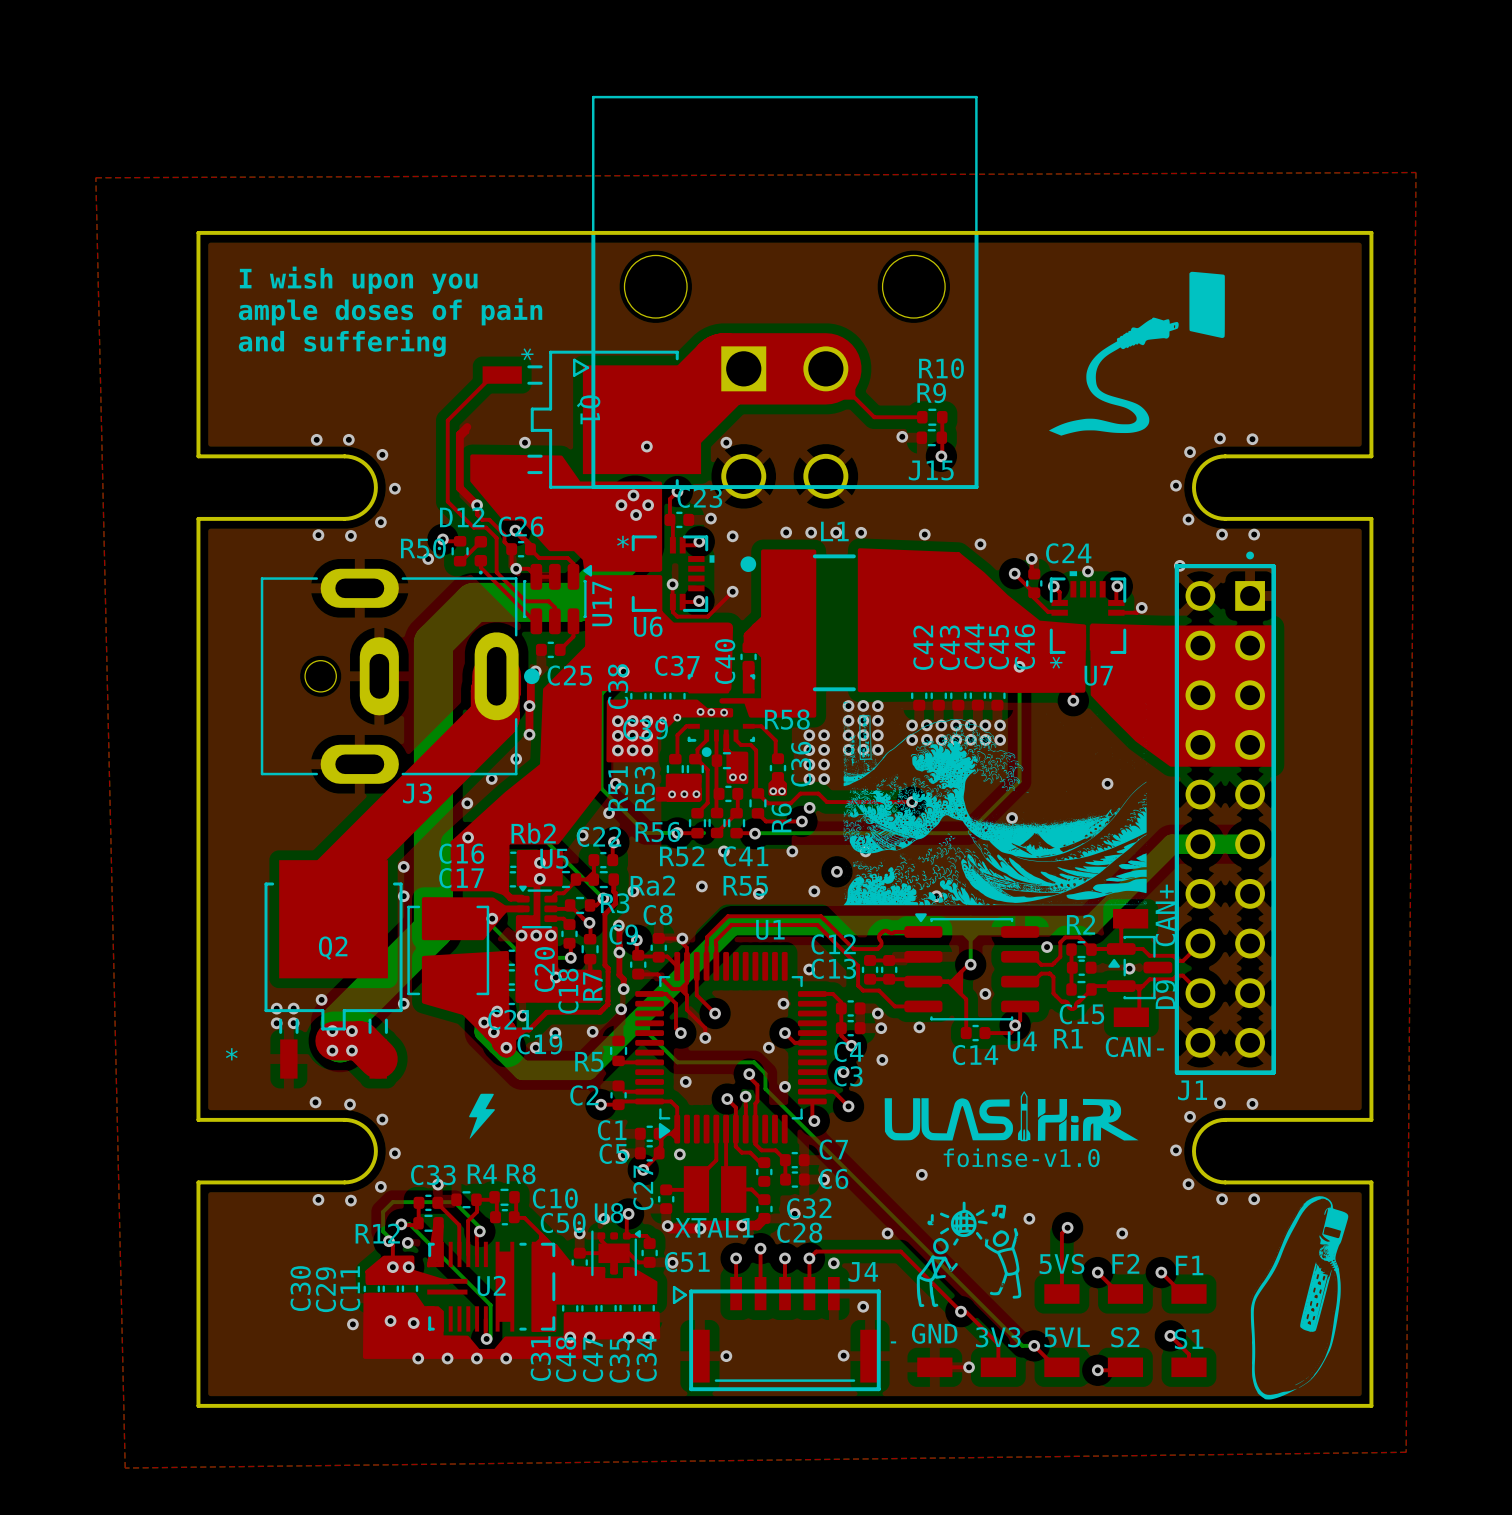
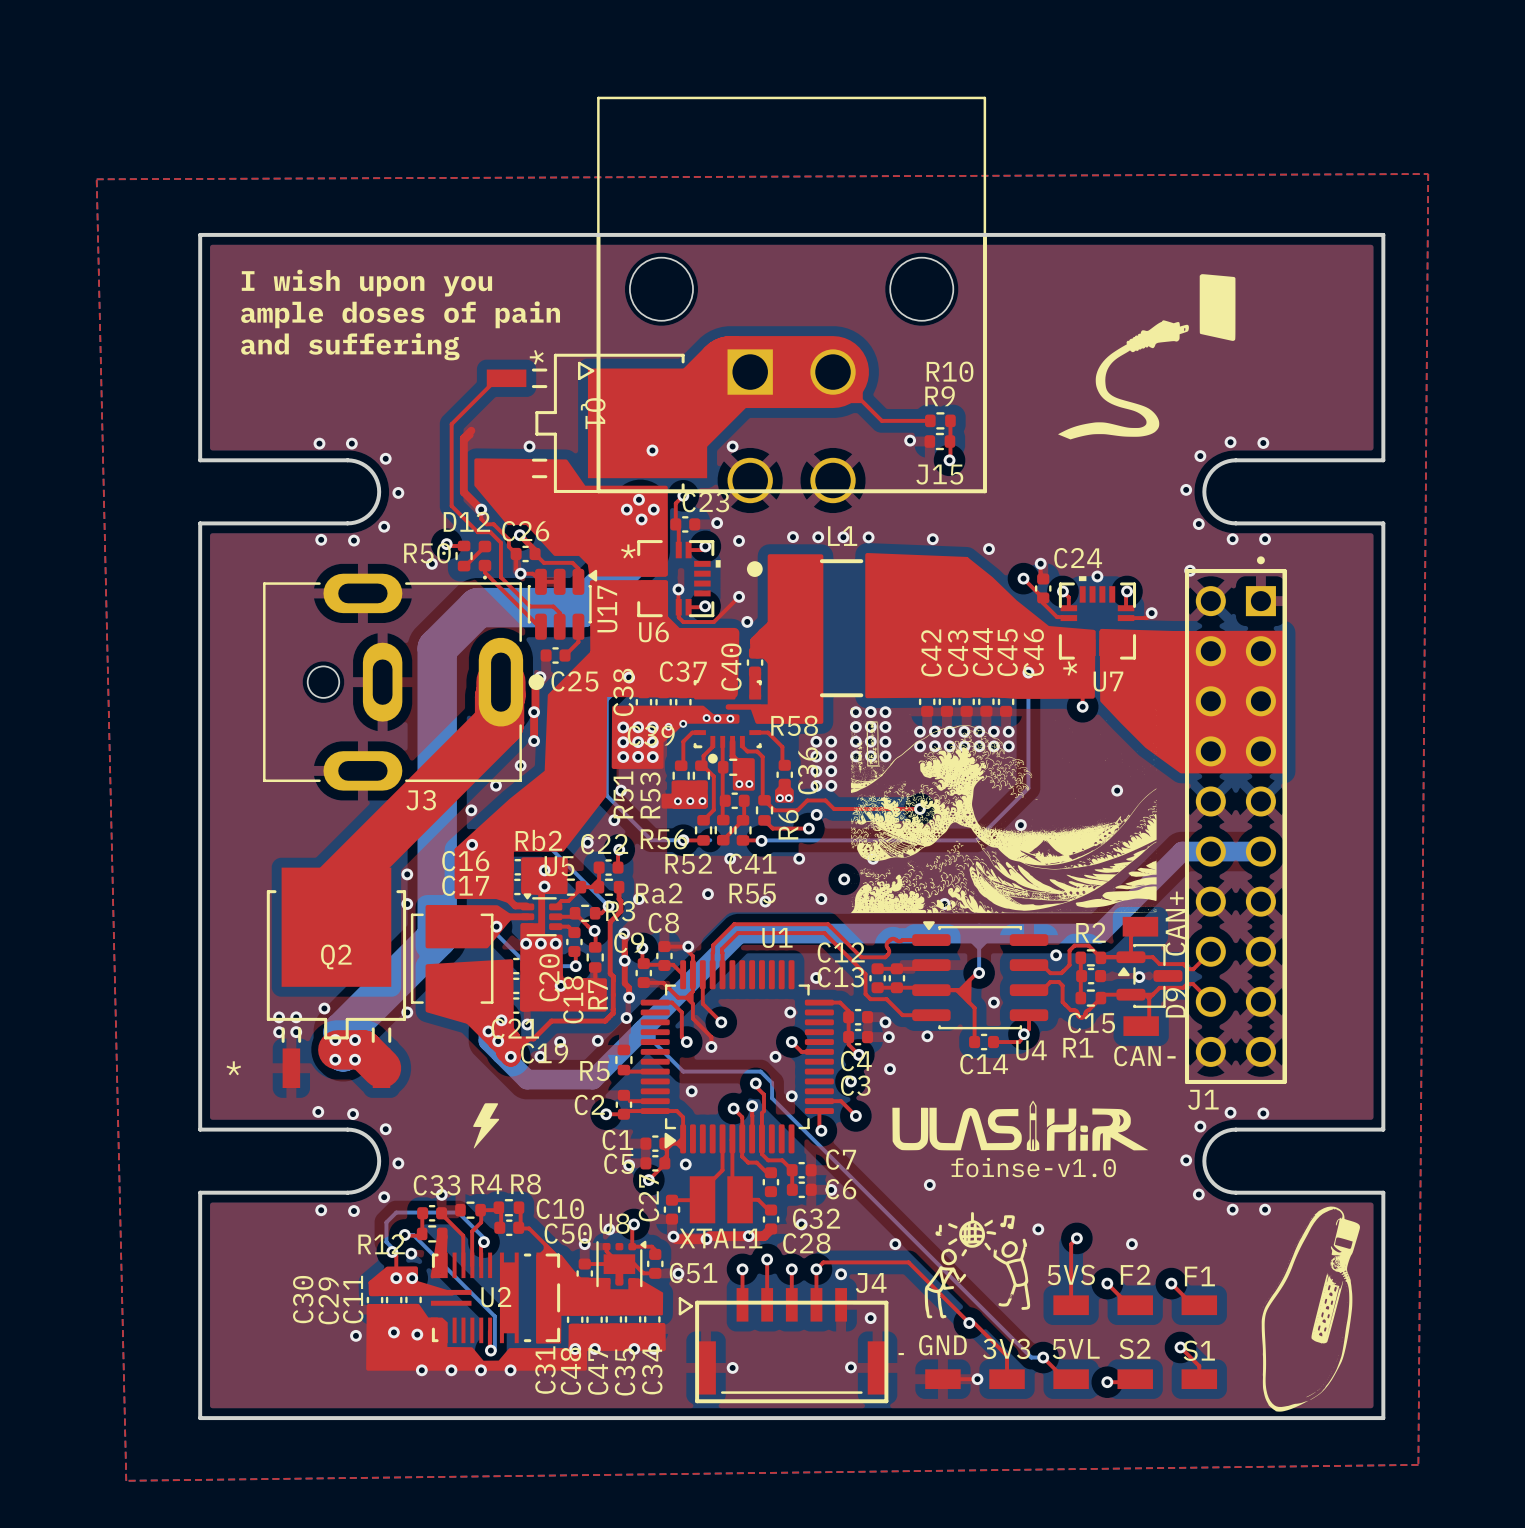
via: none -> (747, 621)

